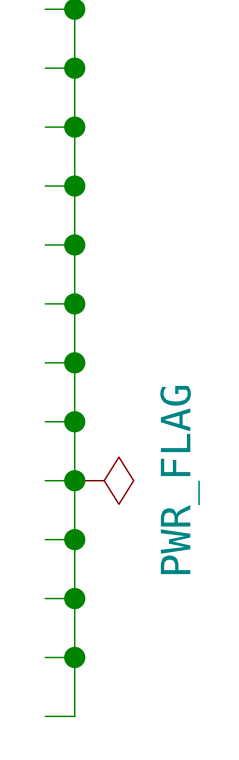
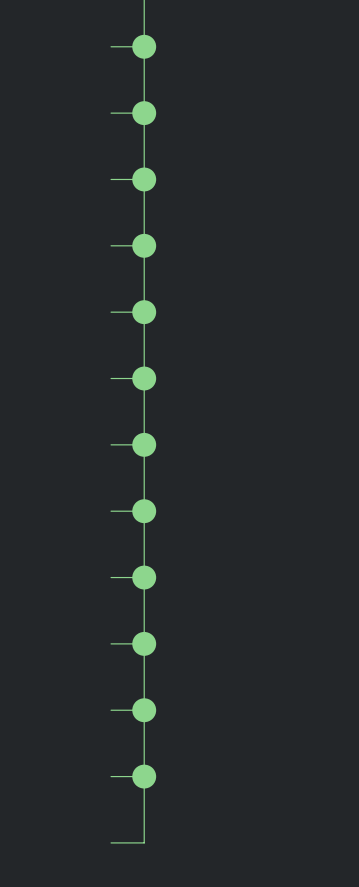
power symbol: PWR_FLAG (104, 480) -> none

